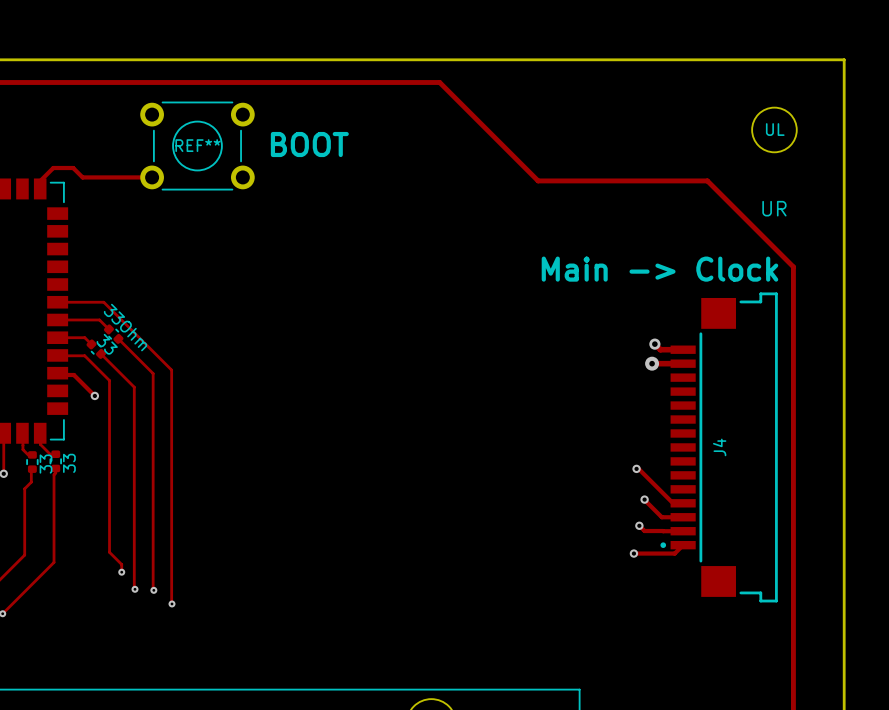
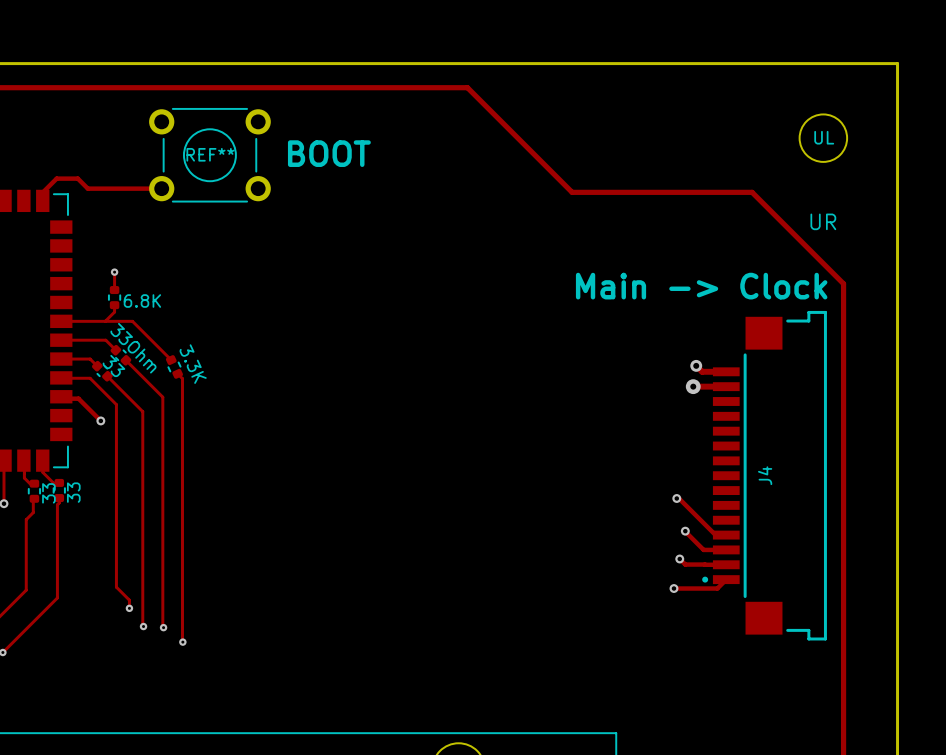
track: none -> (114, 272) (114, 290)
via: none -> (114, 272)
6.8K: none -> (114, 297)
track: none -> (114, 305) (114, 312) (105, 321)
track: (103, 302) (171, 370) -> (110, 321) (132, 321) (171, 360)
3.3K: none -> (174, 366)
track: none -> (177, 373) (182, 378) (182, 393)

